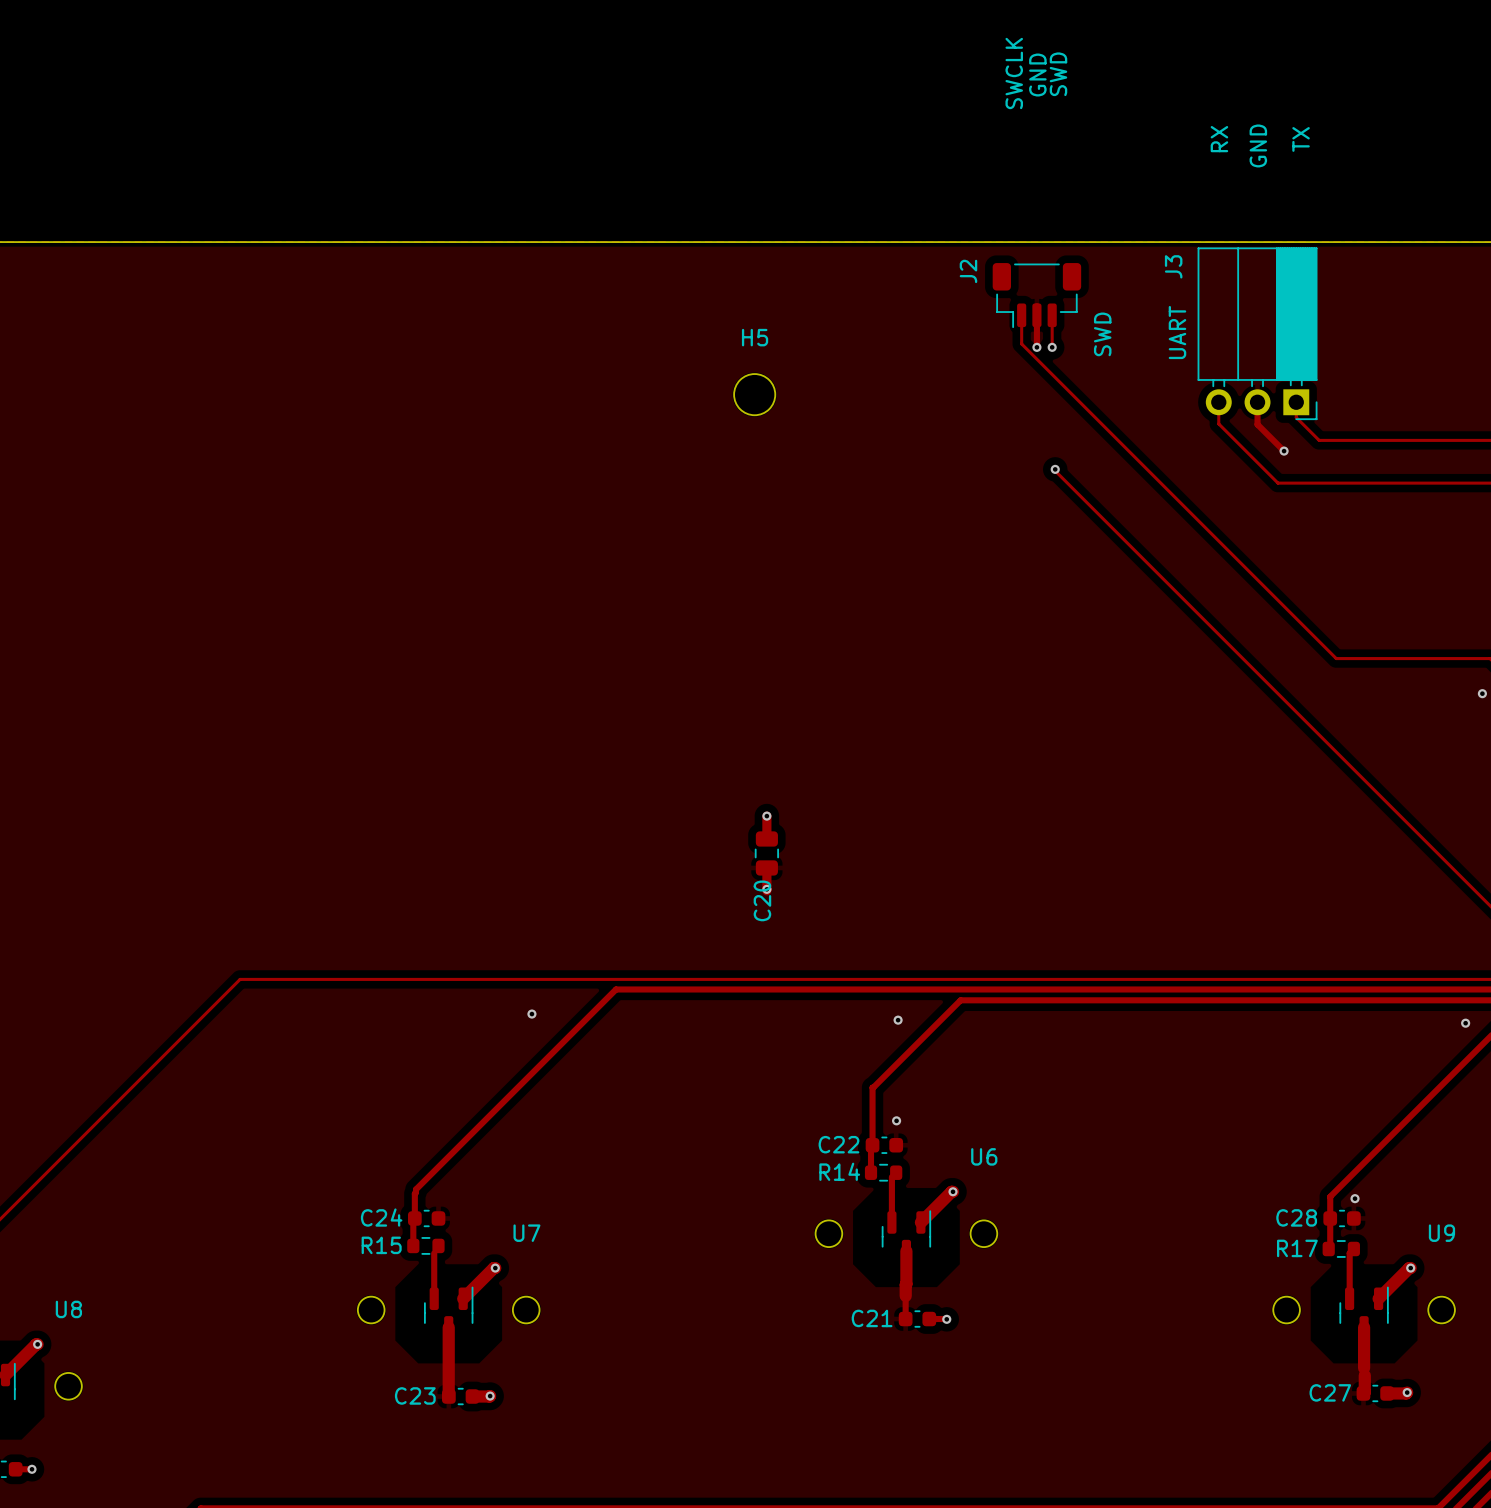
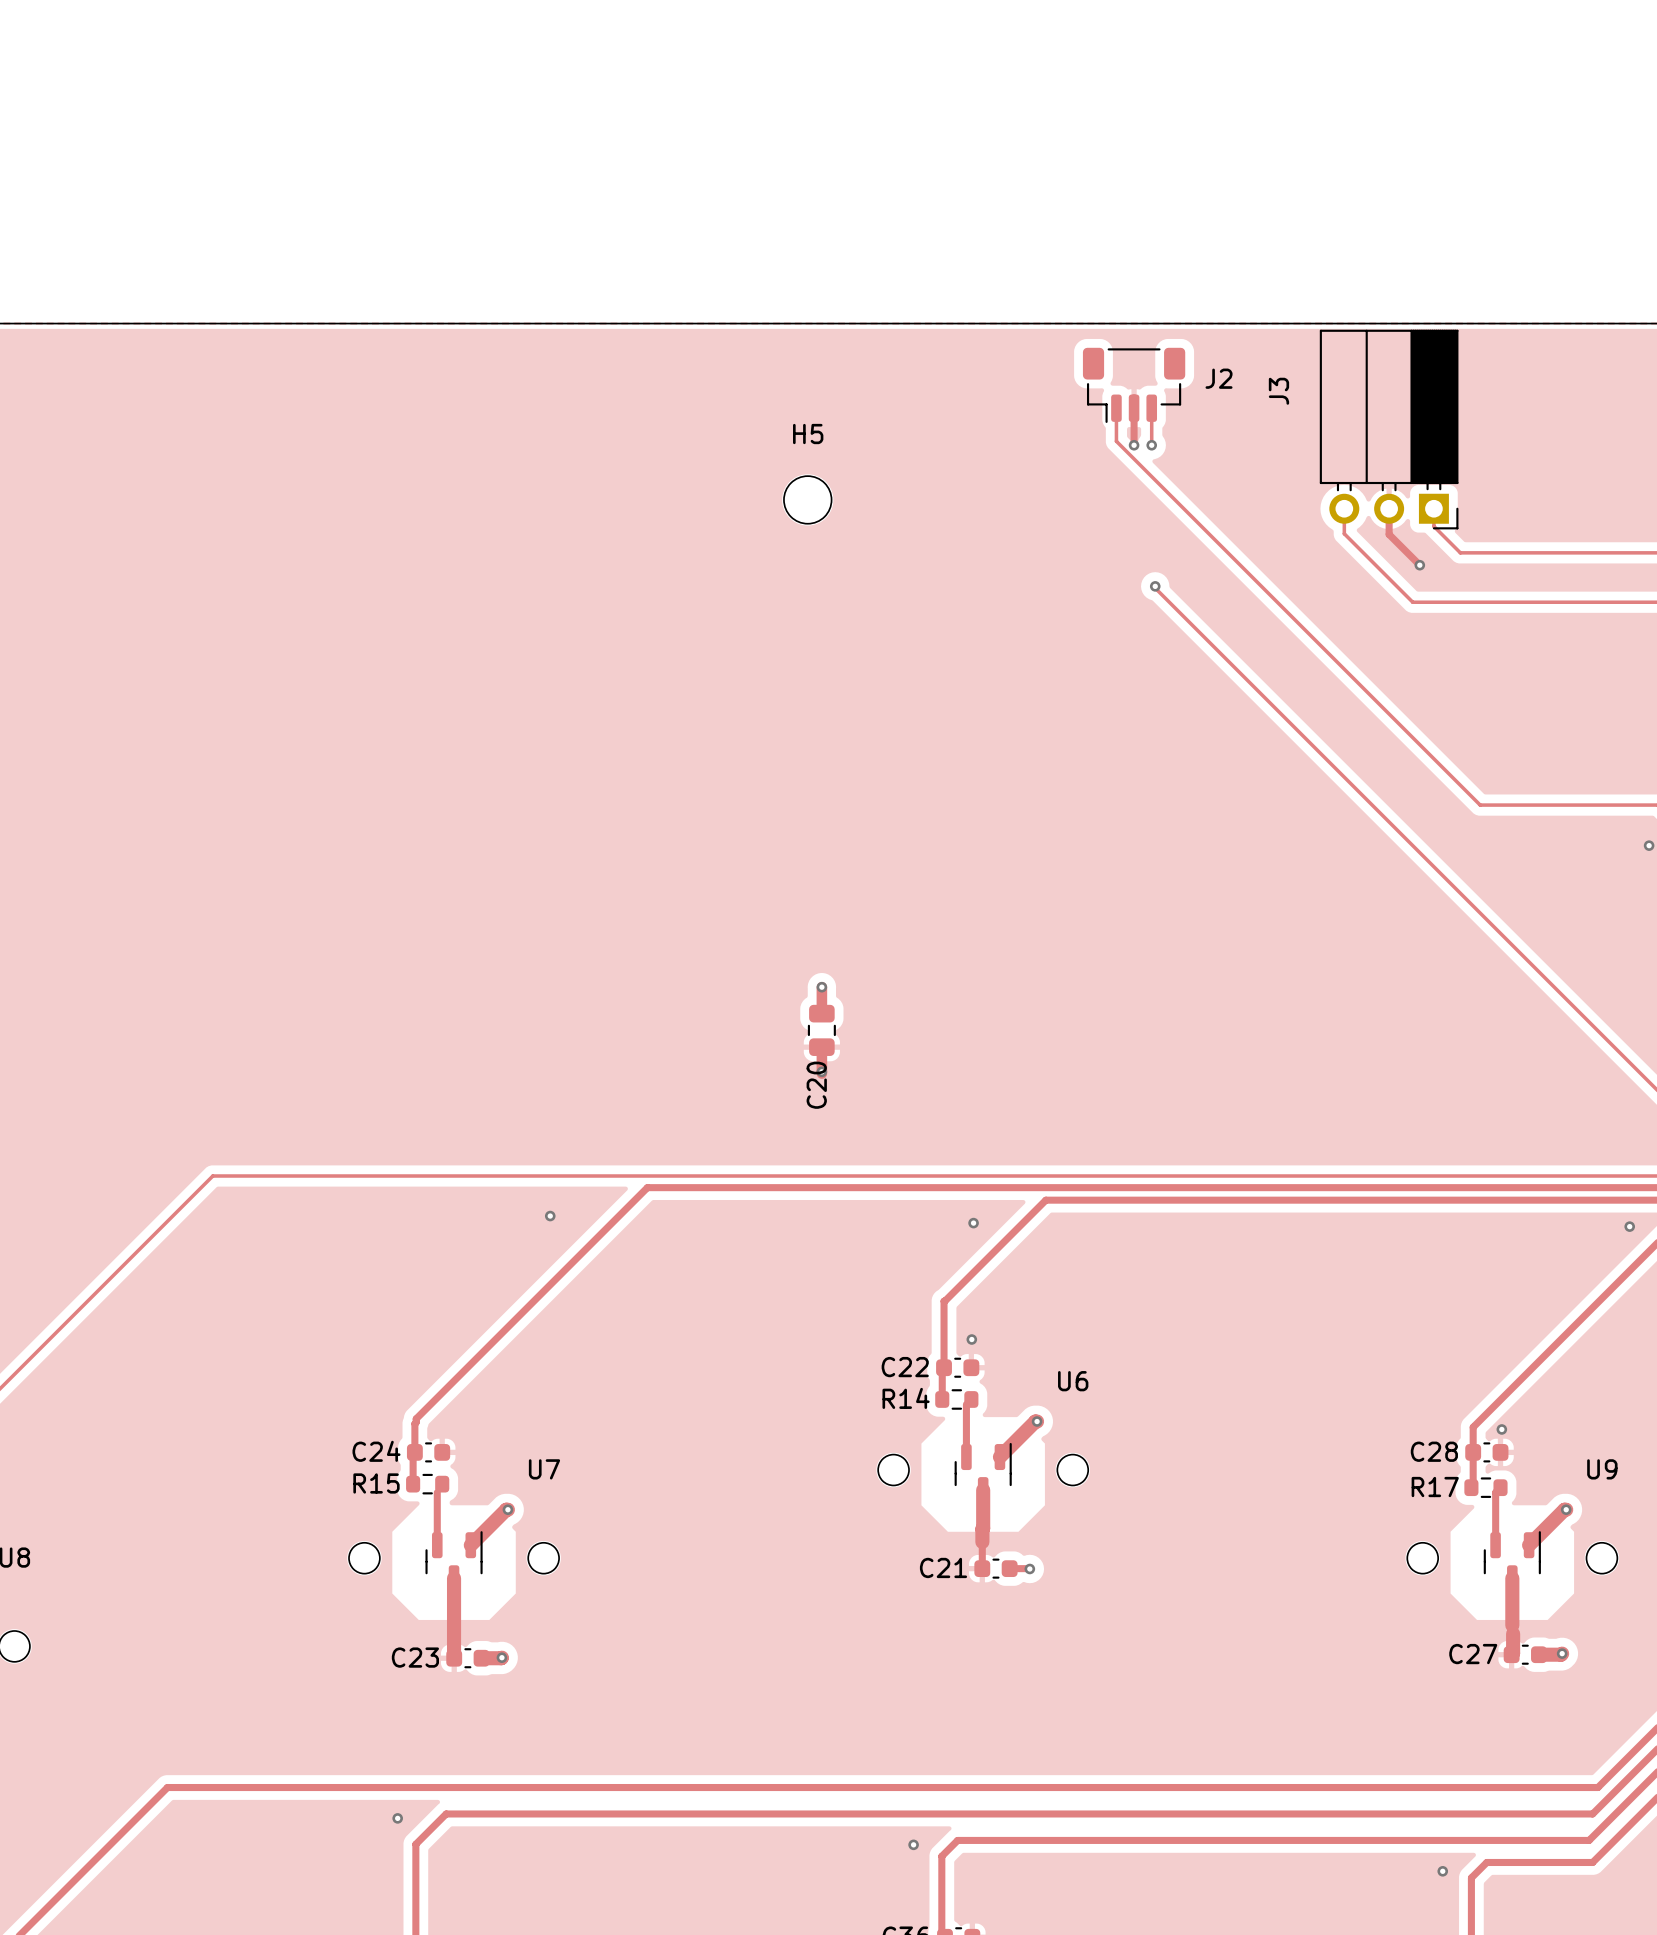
text: SWCLK (1014, 73) -> none
text: SWD (1058, 74) -> none
text: GND (1037, 75) -> none
text: RX (1219, 139) -> none
text: TX (1301, 139) -> none
text: GND (1258, 145) -> none
J3 name position: J3 (1173, 266) -> J3 (1278, 391)
J2 name rotation: 0° (968, 271) -> 90° clockwise (1219, 378)
J2 name position: J2 (968, 271) -> J2 (1219, 378)
J3 value: UART (1177, 332) -> none
J2 value: SWD (1102, 334) -> none

